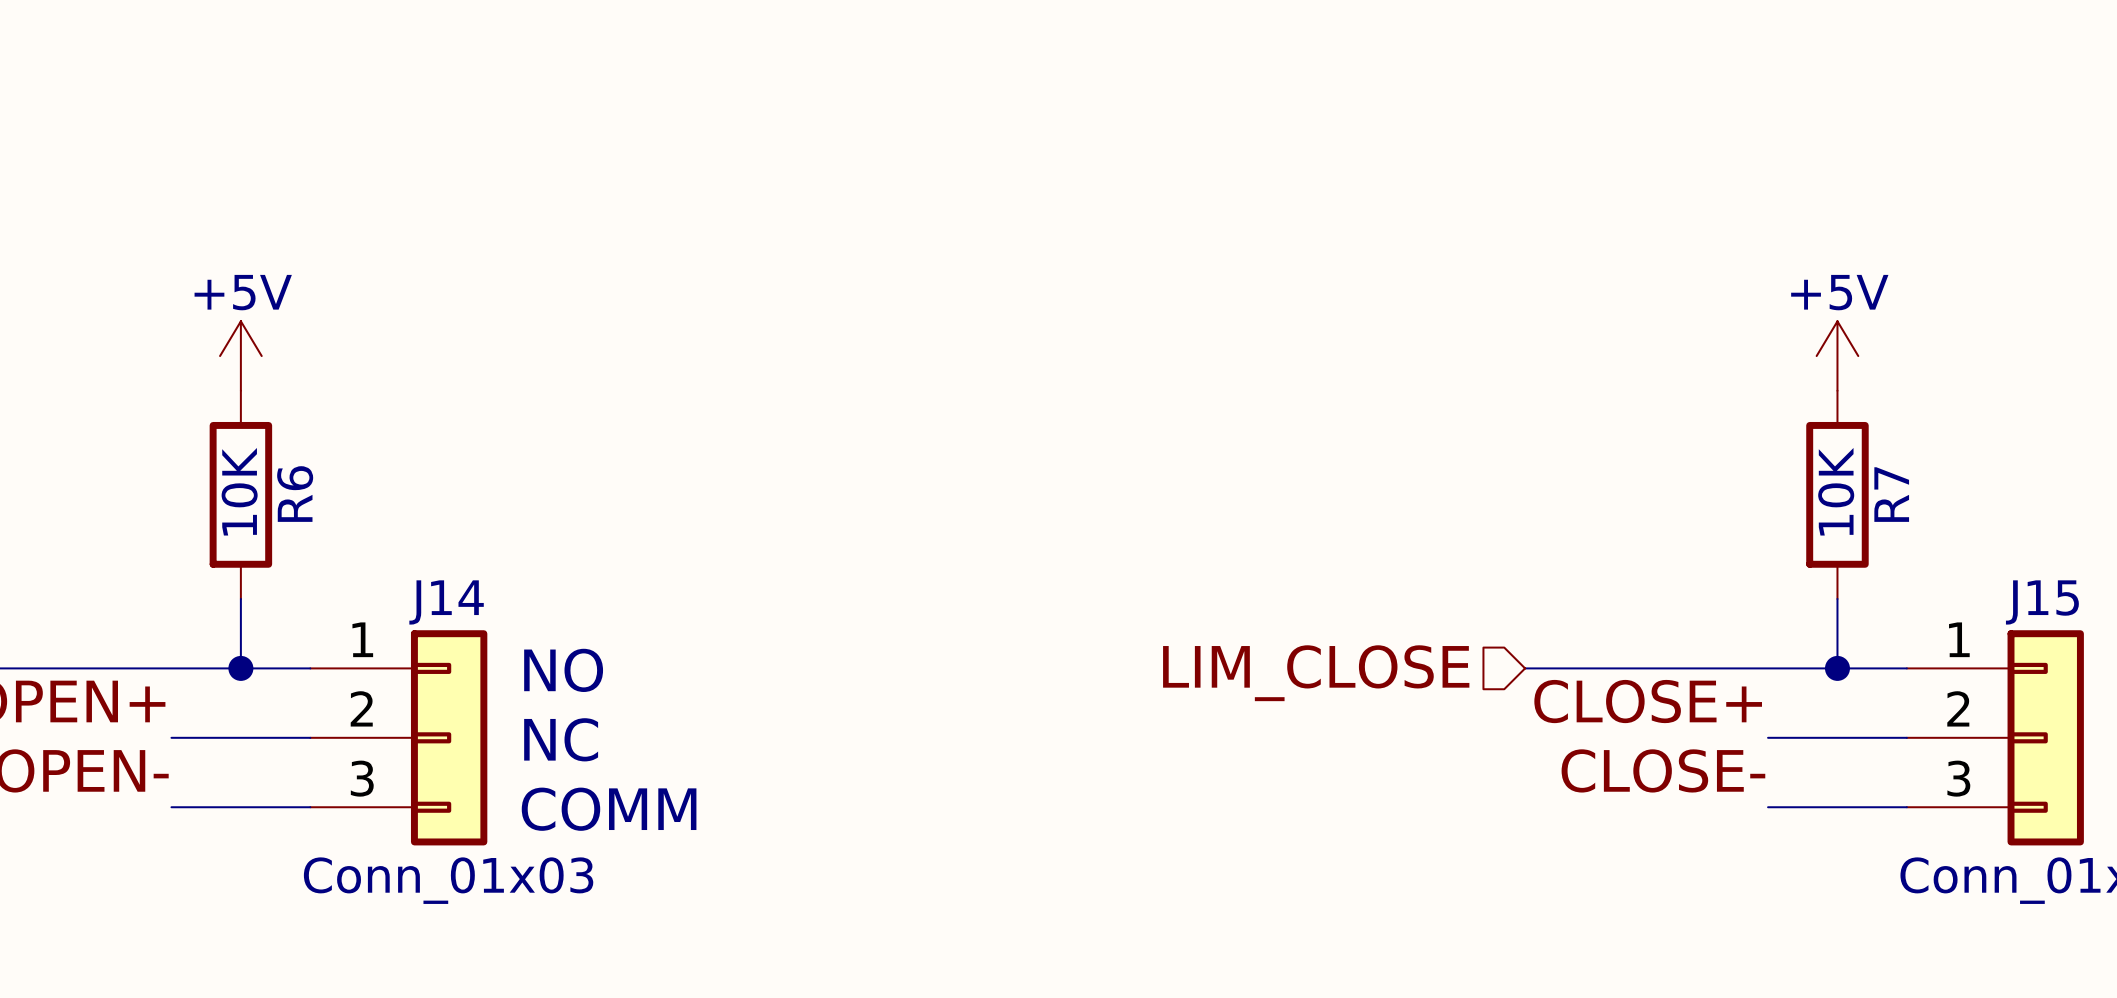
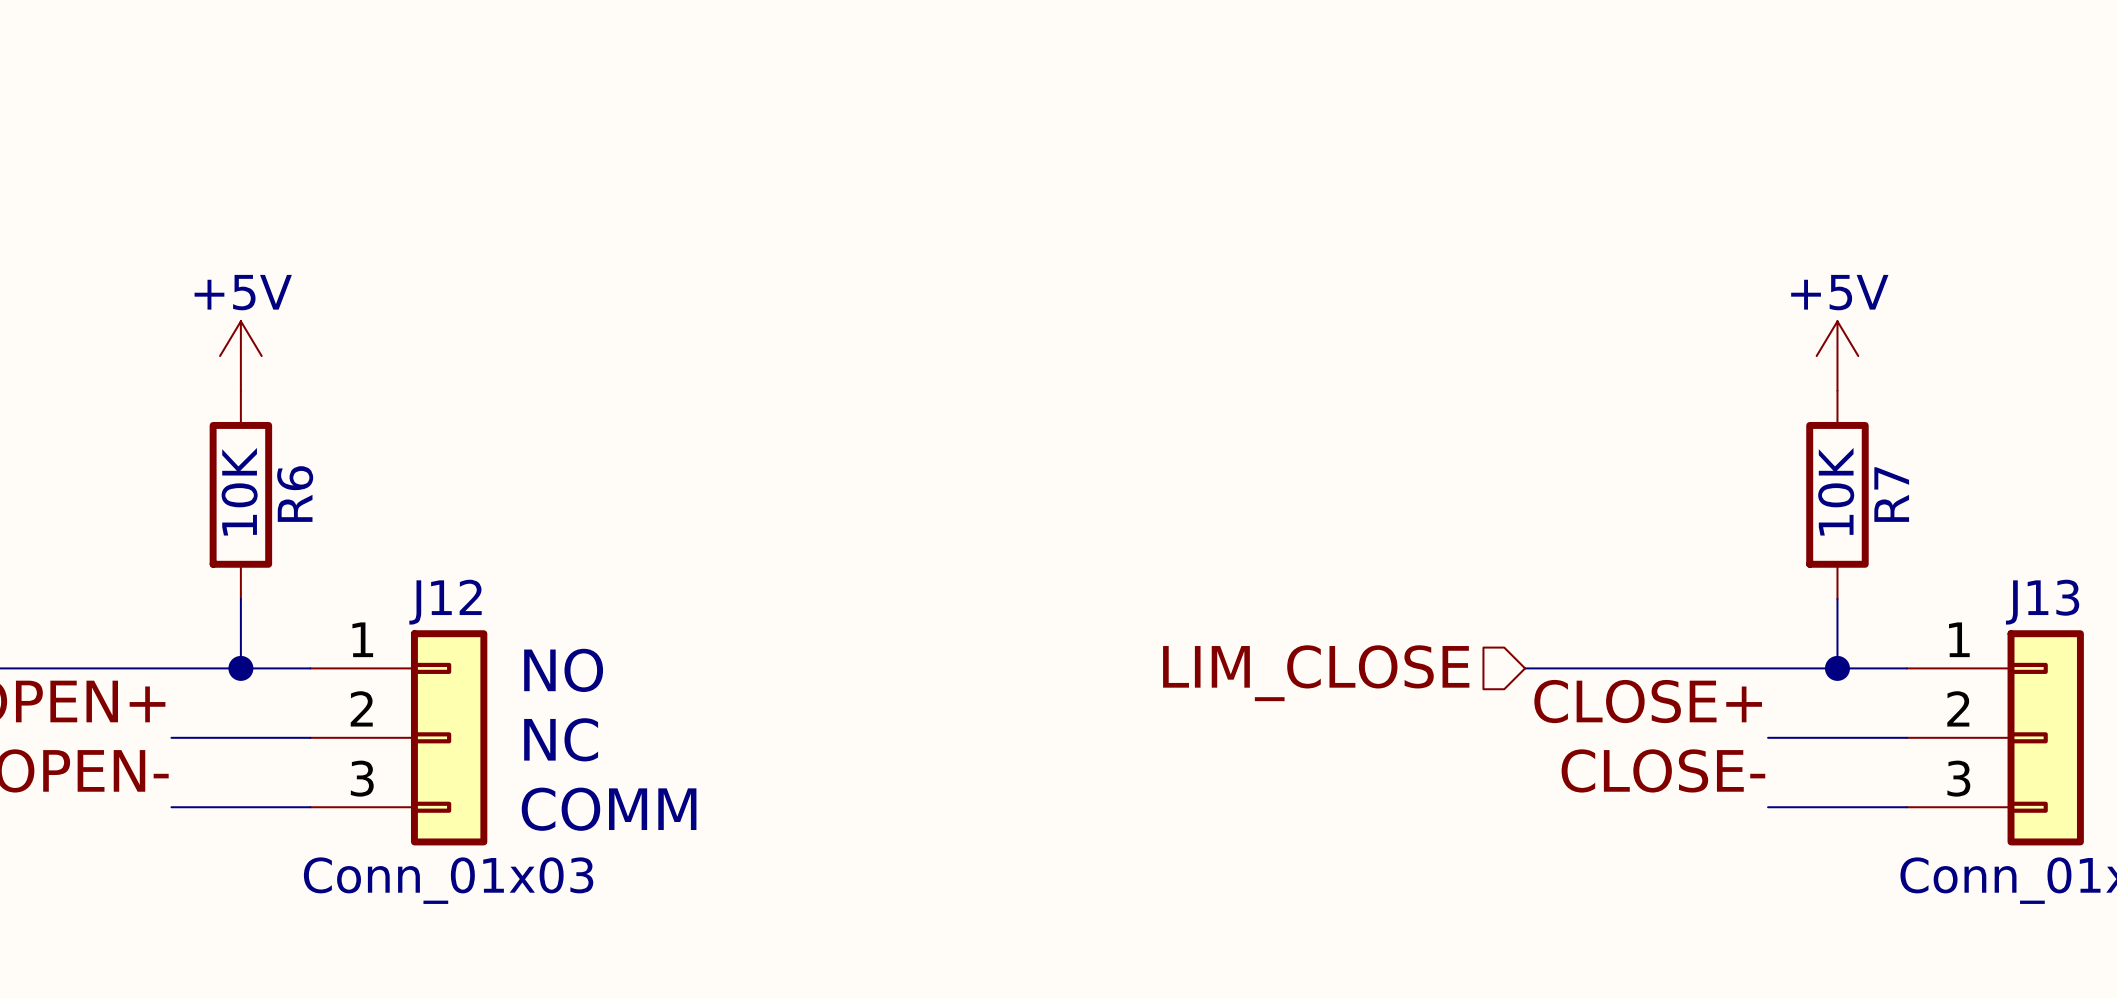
J14 name: J14 (446, 602) -> J12 (445, 602)
J15 name: J15 (2042, 602) -> J13 (2042, 602)

